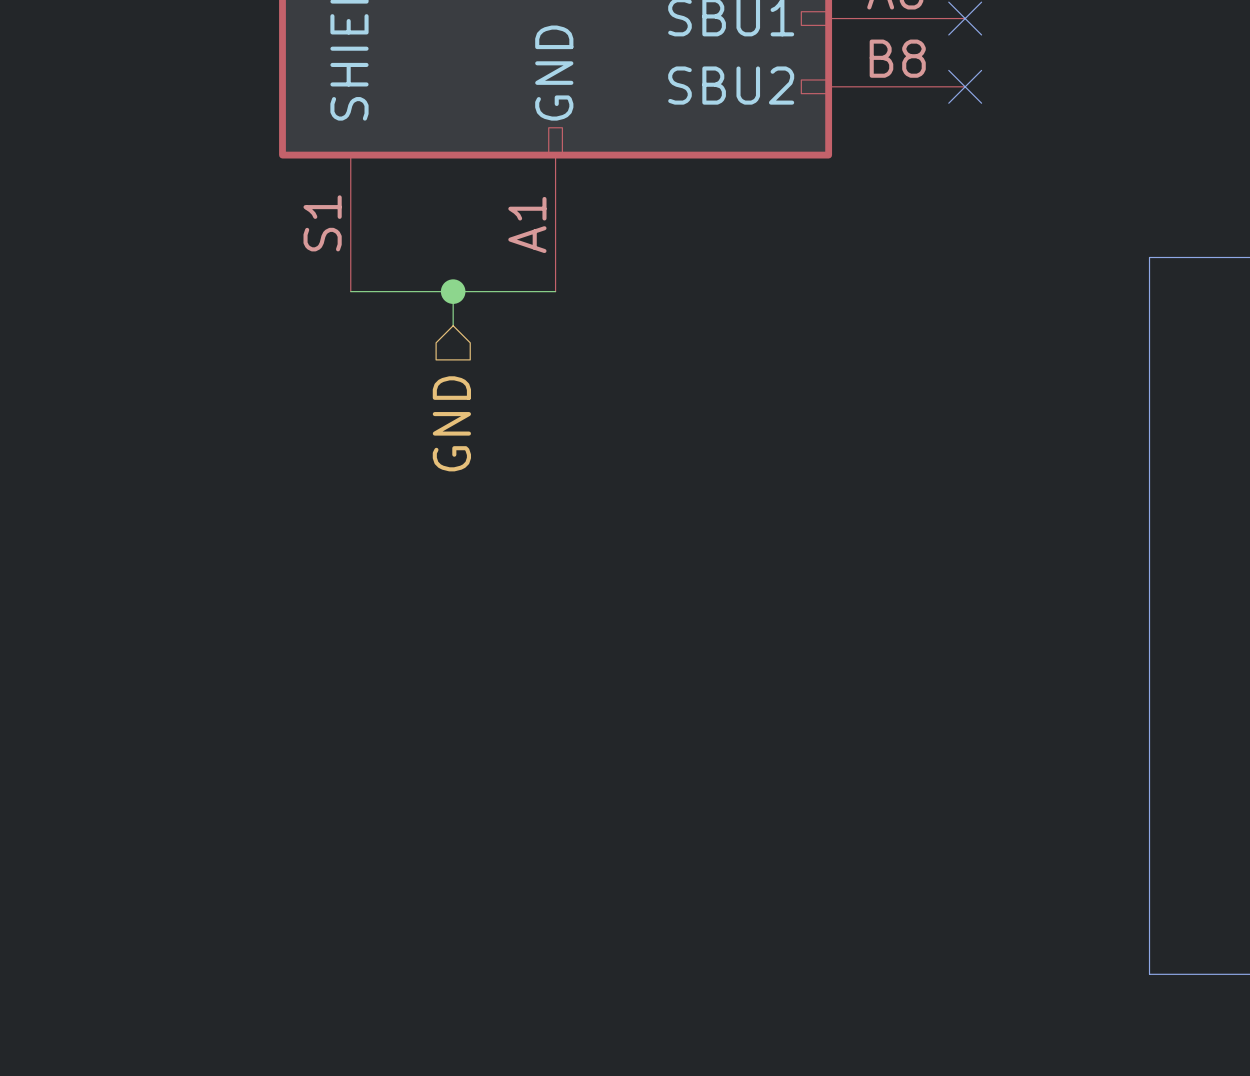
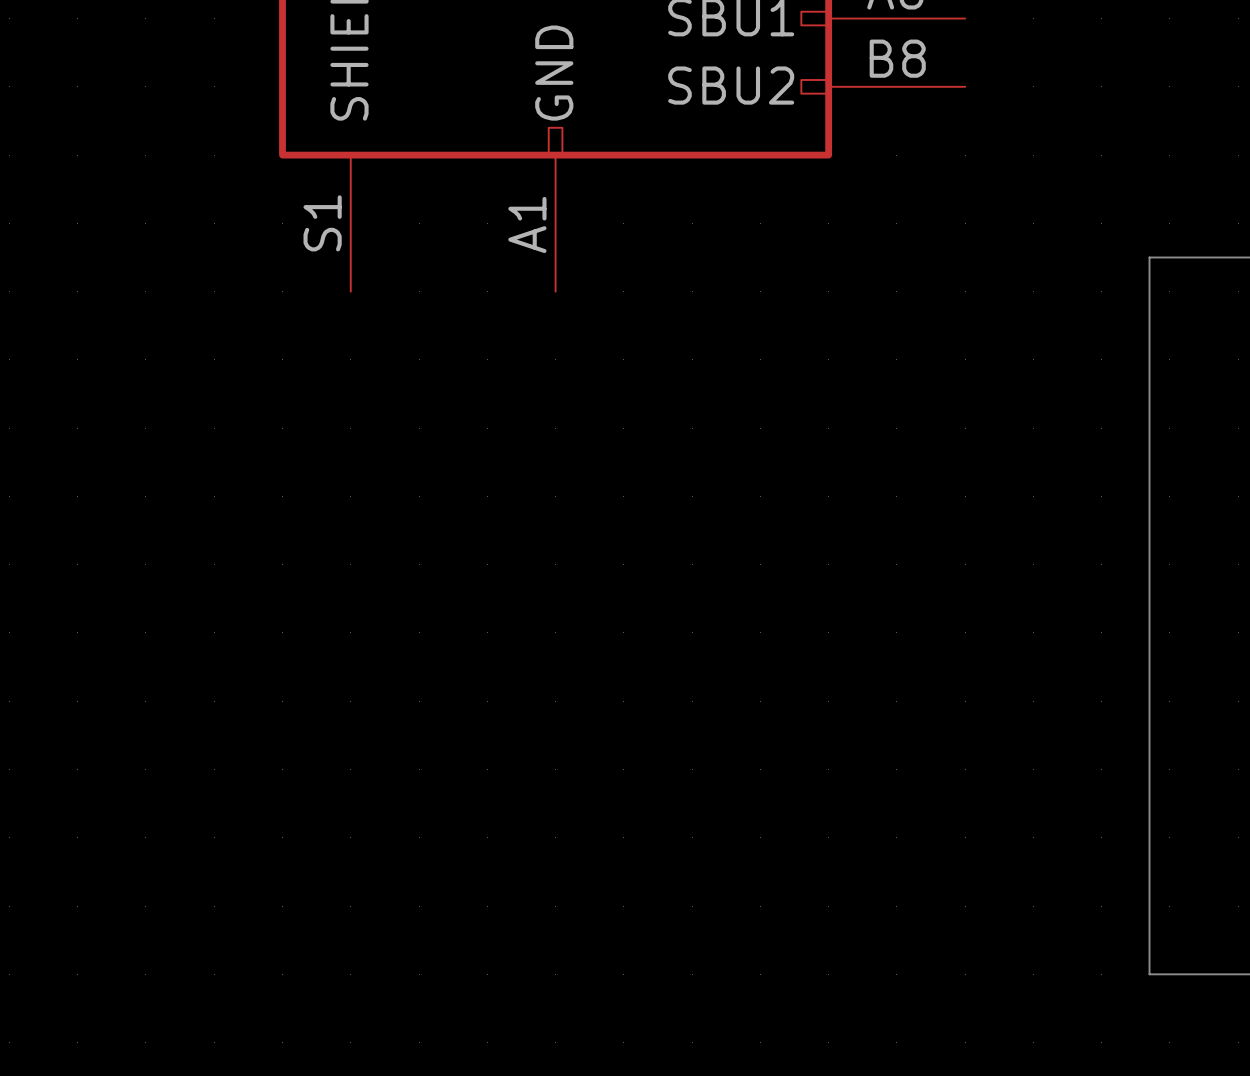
no-connect mark: (965, 18) -> none
no-connect mark: (965, 86) -> none
wire: (350, 291) (555, 291) -> none
wire: (453, 291) (453, 325) -> none
junction: (453, 291) -> none
hierarchical label: GND (451, 423) -> none

